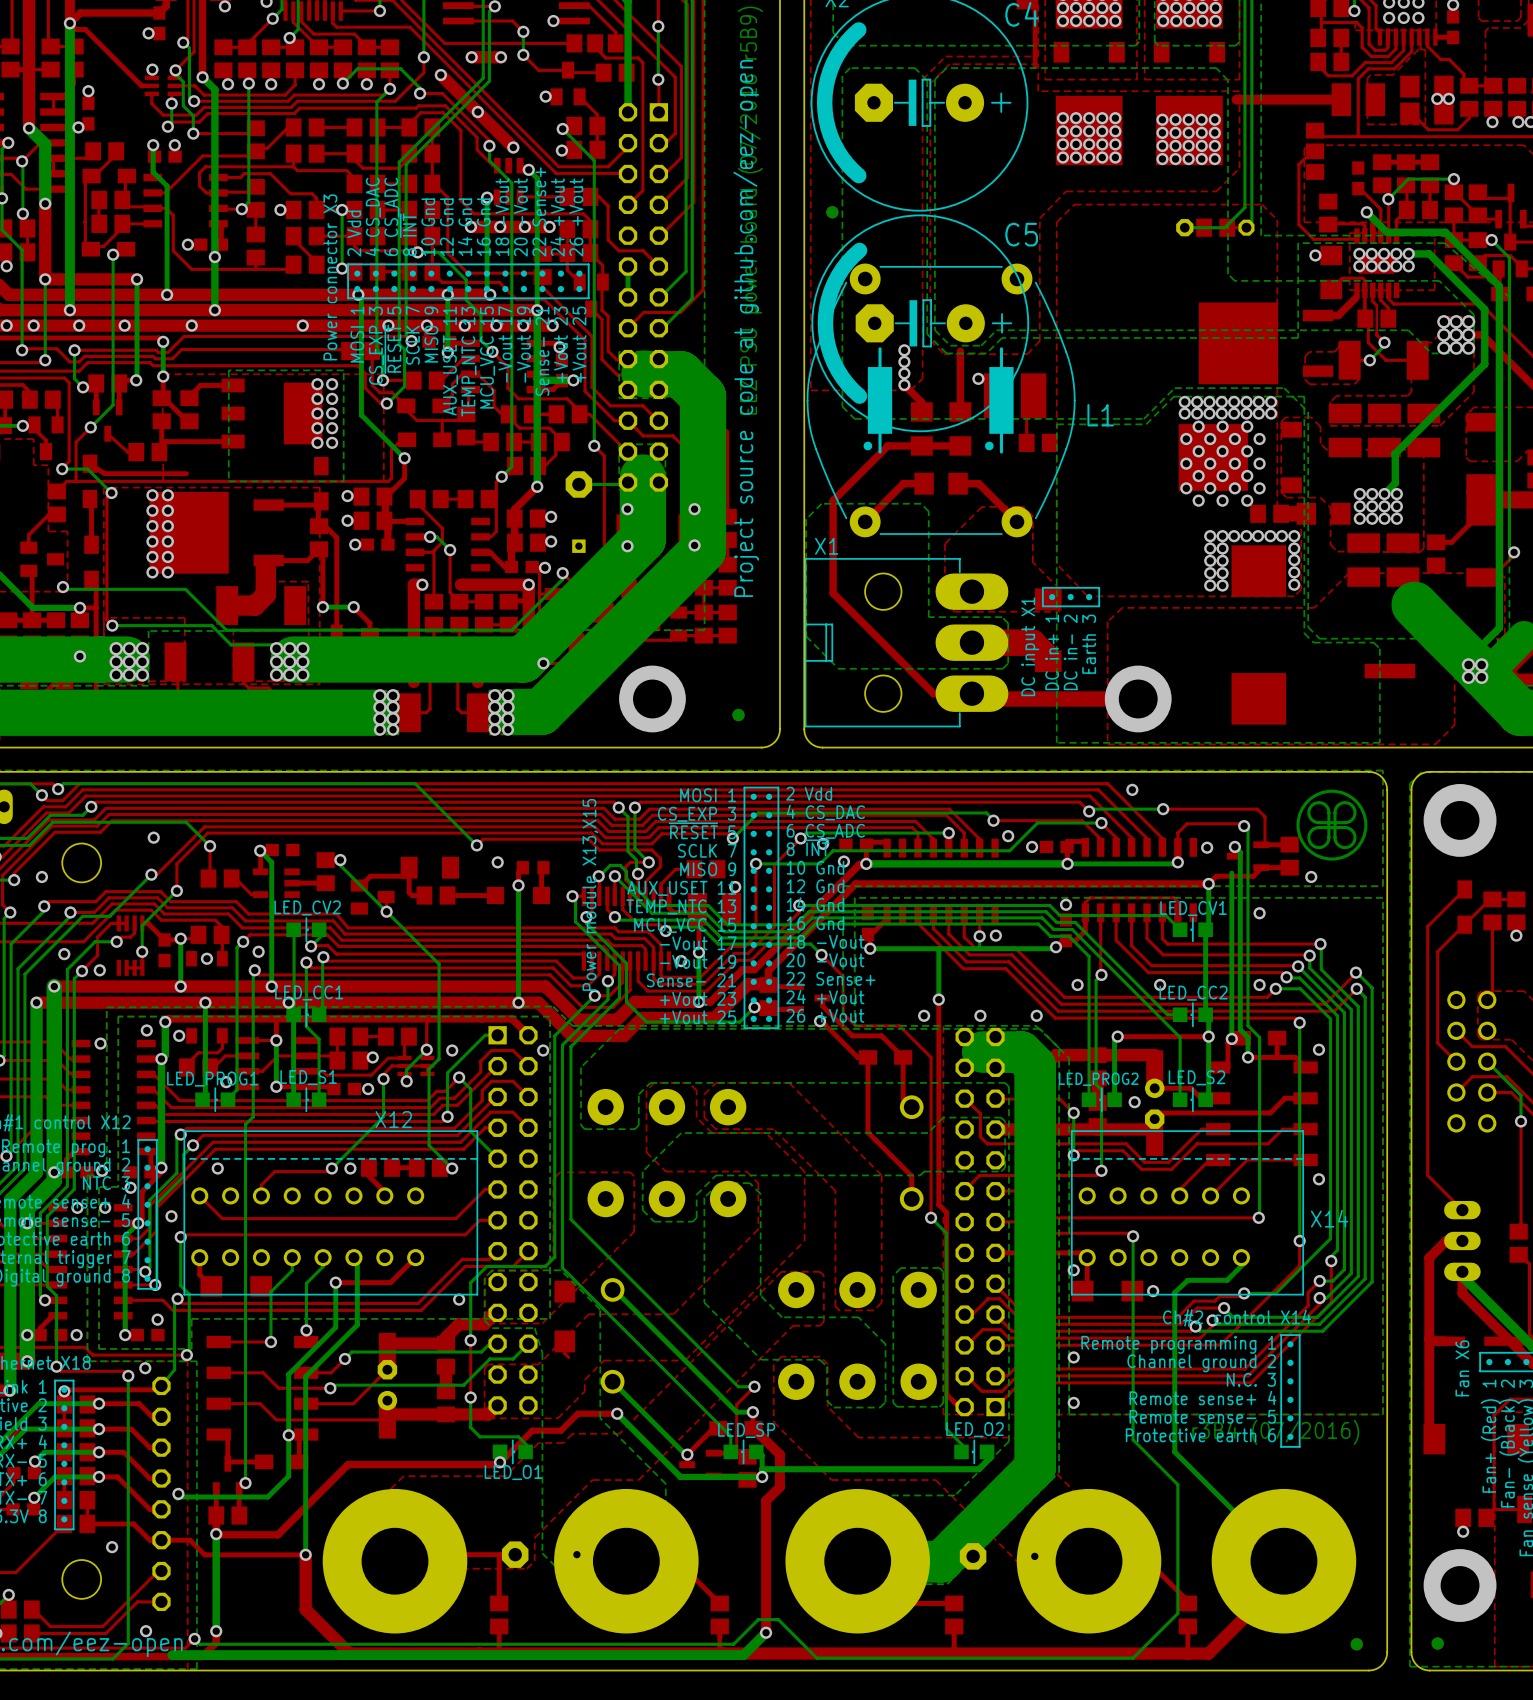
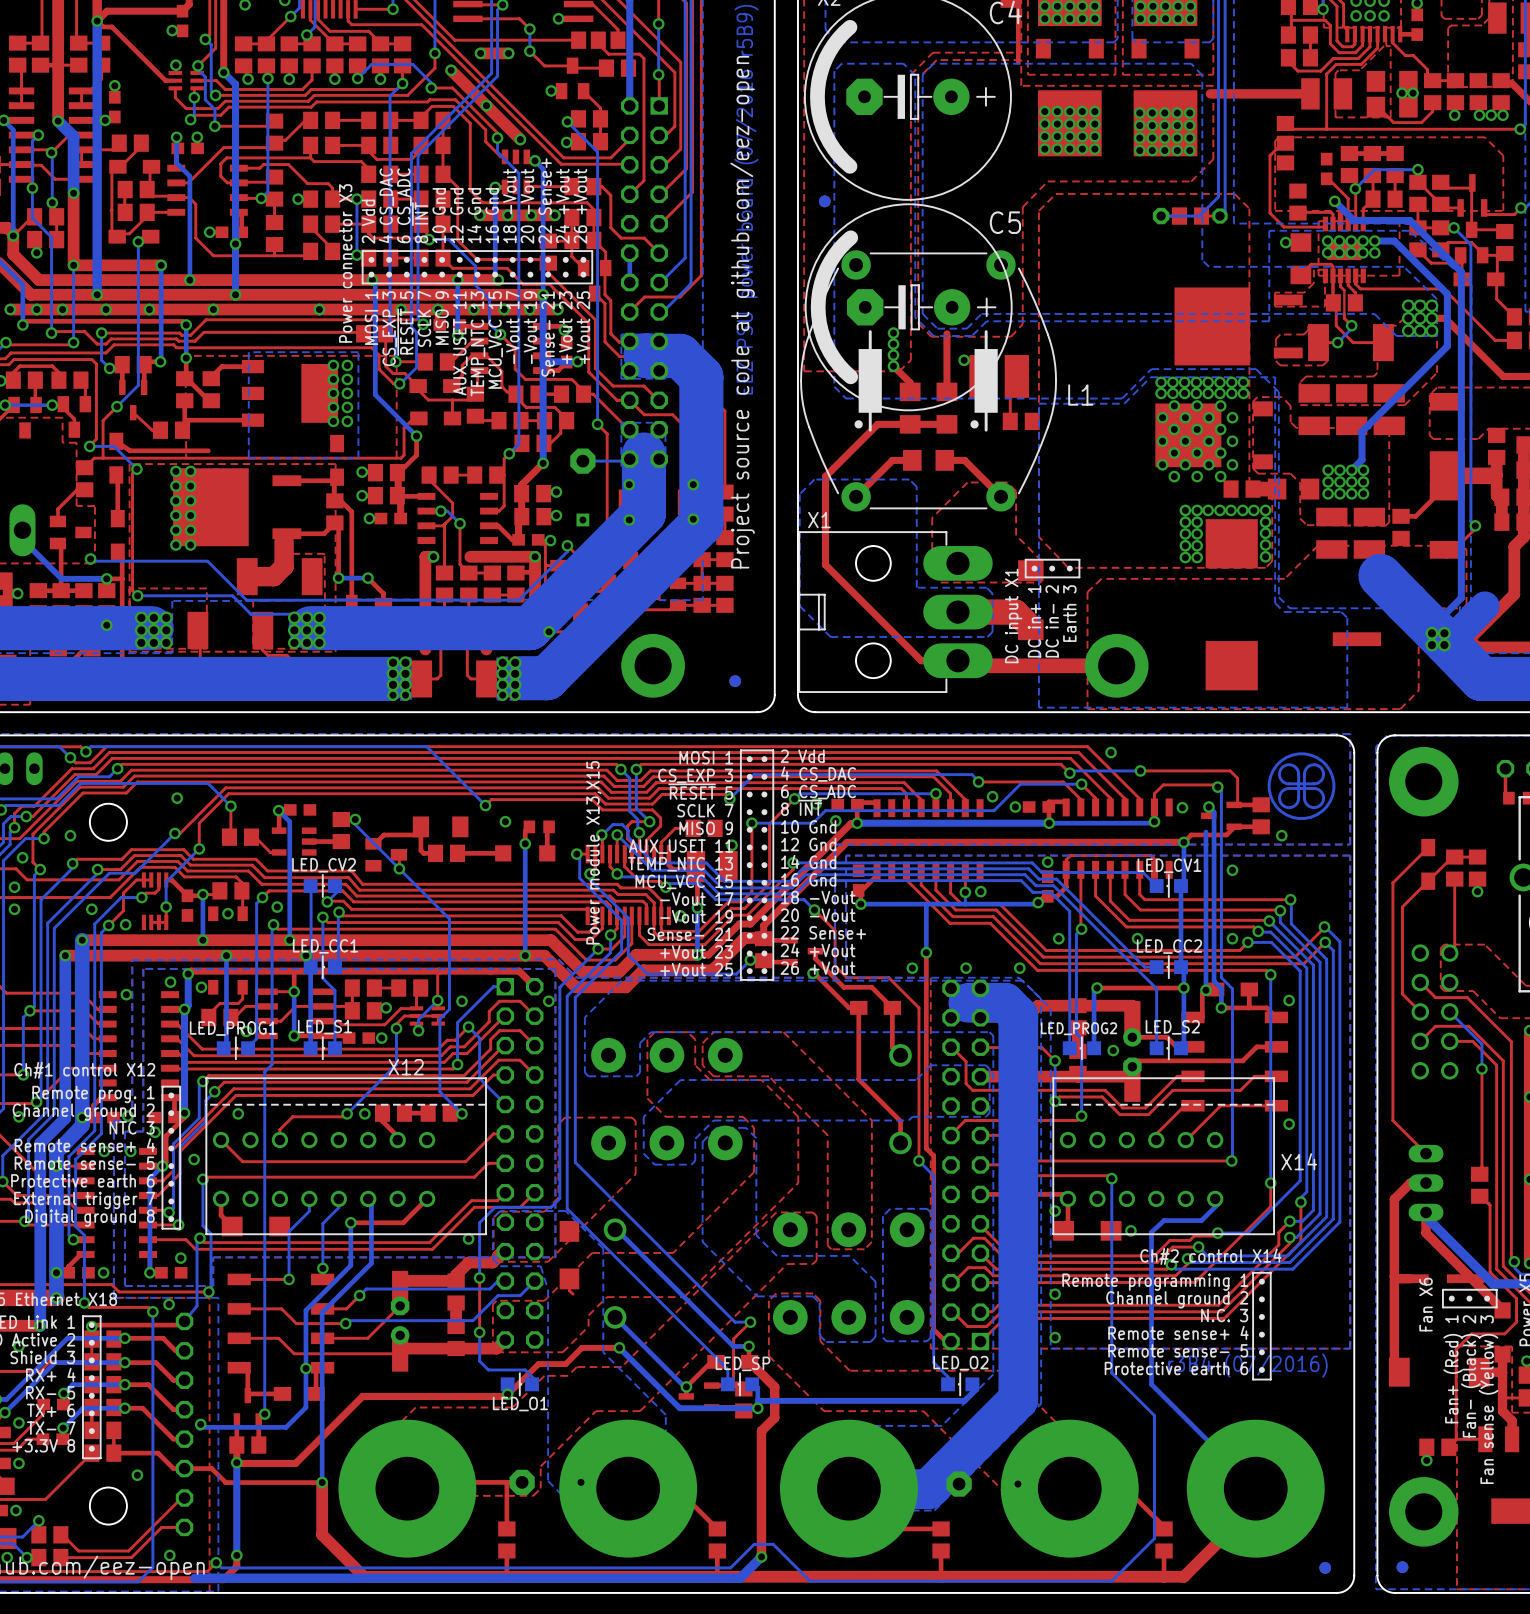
top zone outline: none -> (1325, 269) (1313, 269) (1313, 283) (1304, 292) (1274, 292) (1274, 306) (1325, 306) (1325, 269)
top track: (1355, 297) (1338, 315) (1318, 315) -> none

